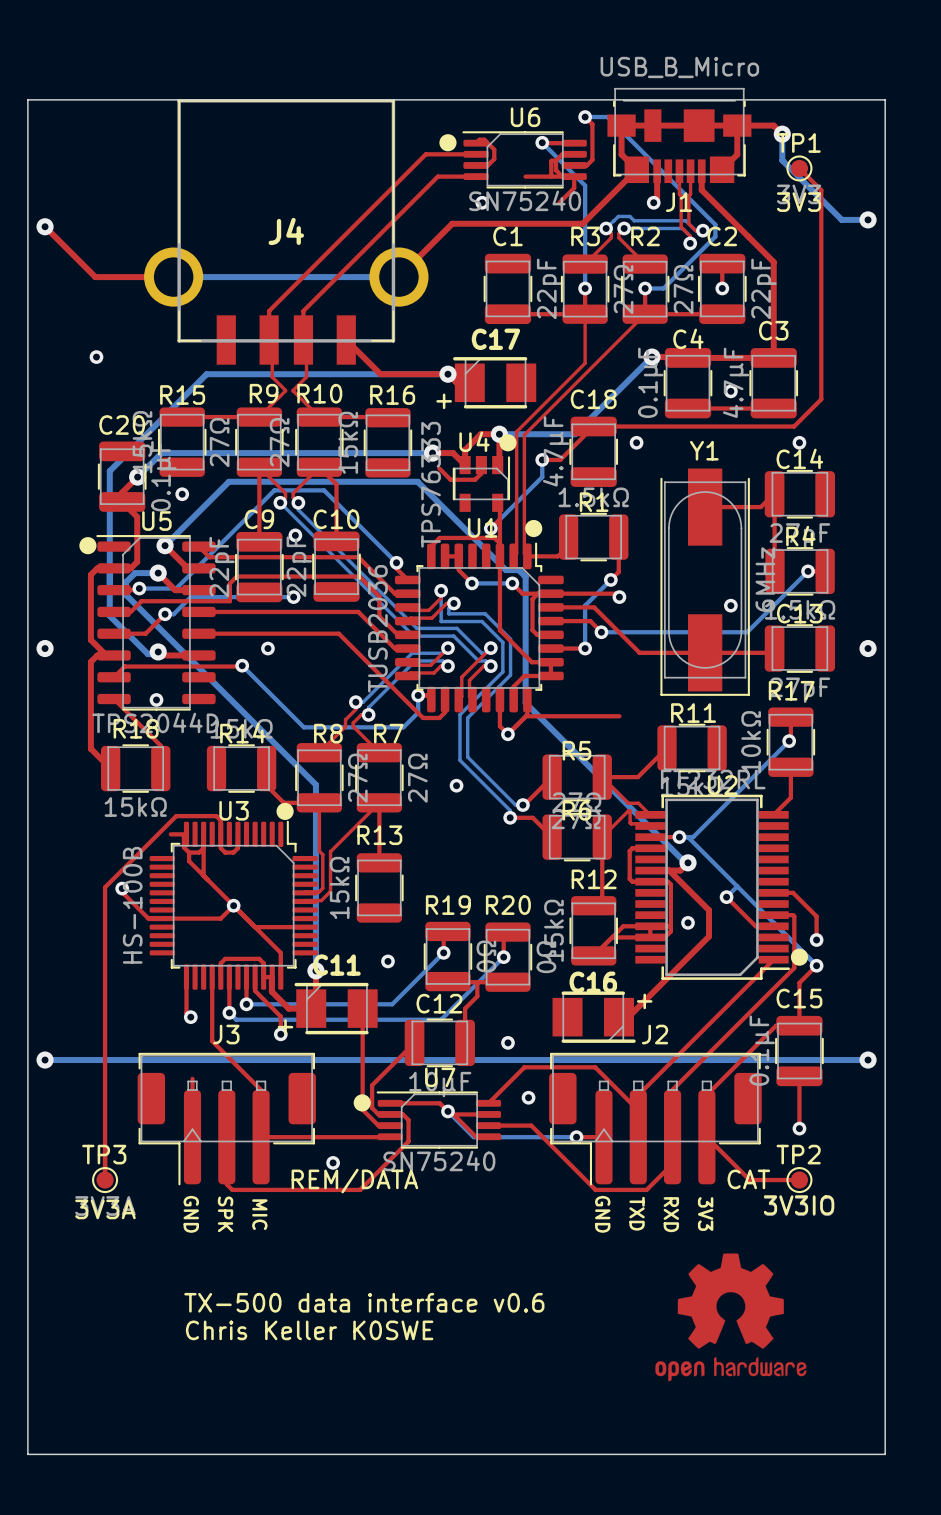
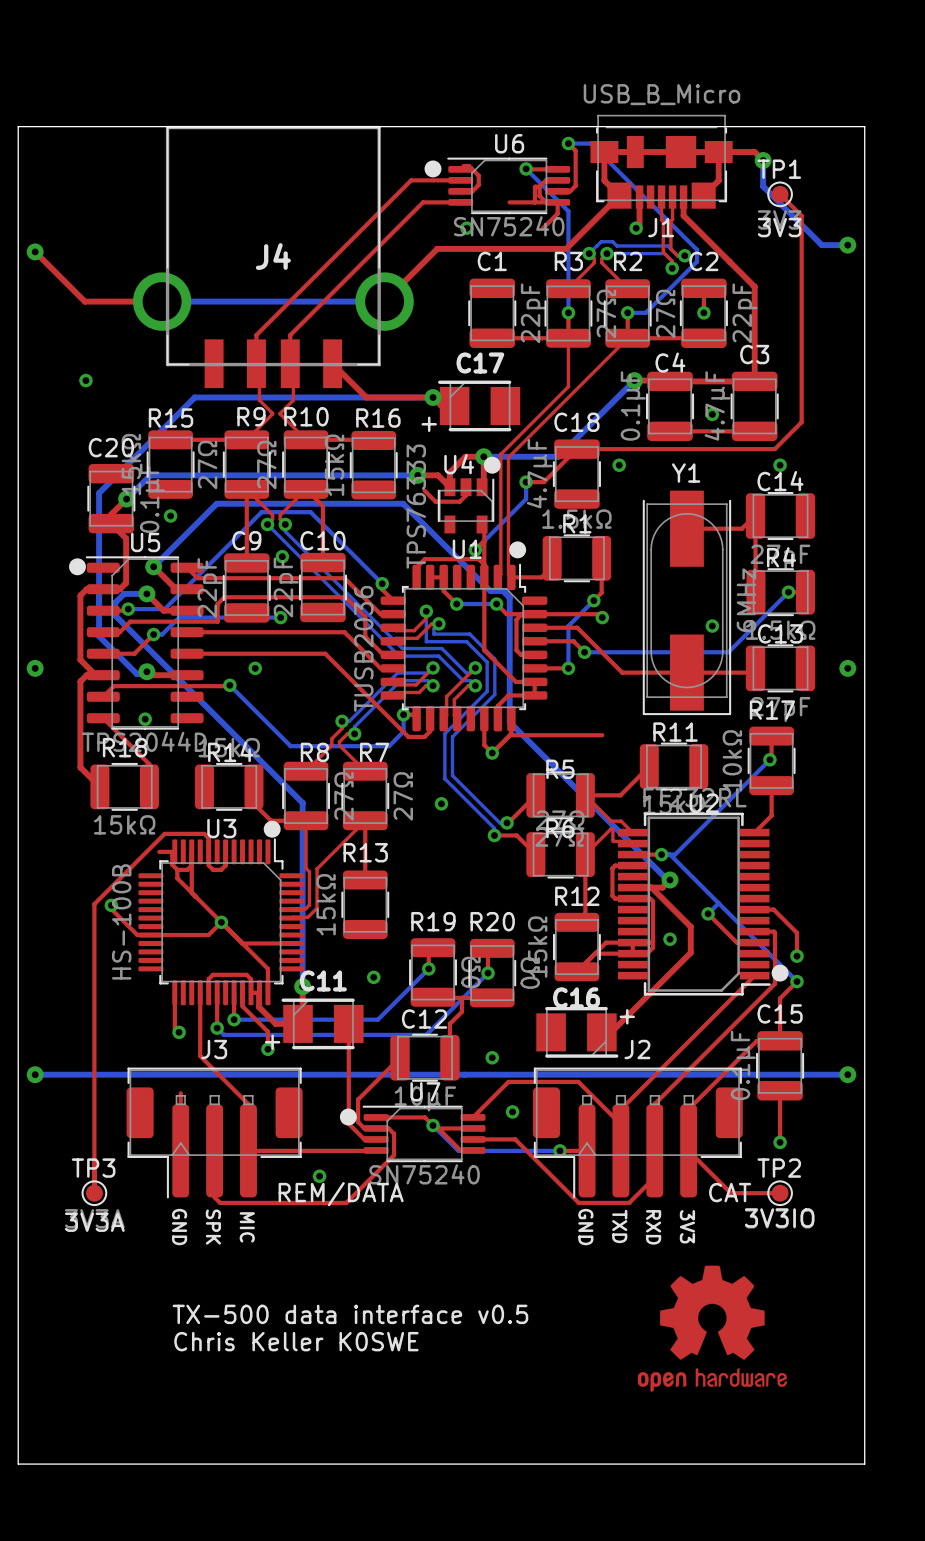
text: TX-500 data interface v0.6 (364, 1302) -> TX-500 data interface v0.5 (350, 1314)

